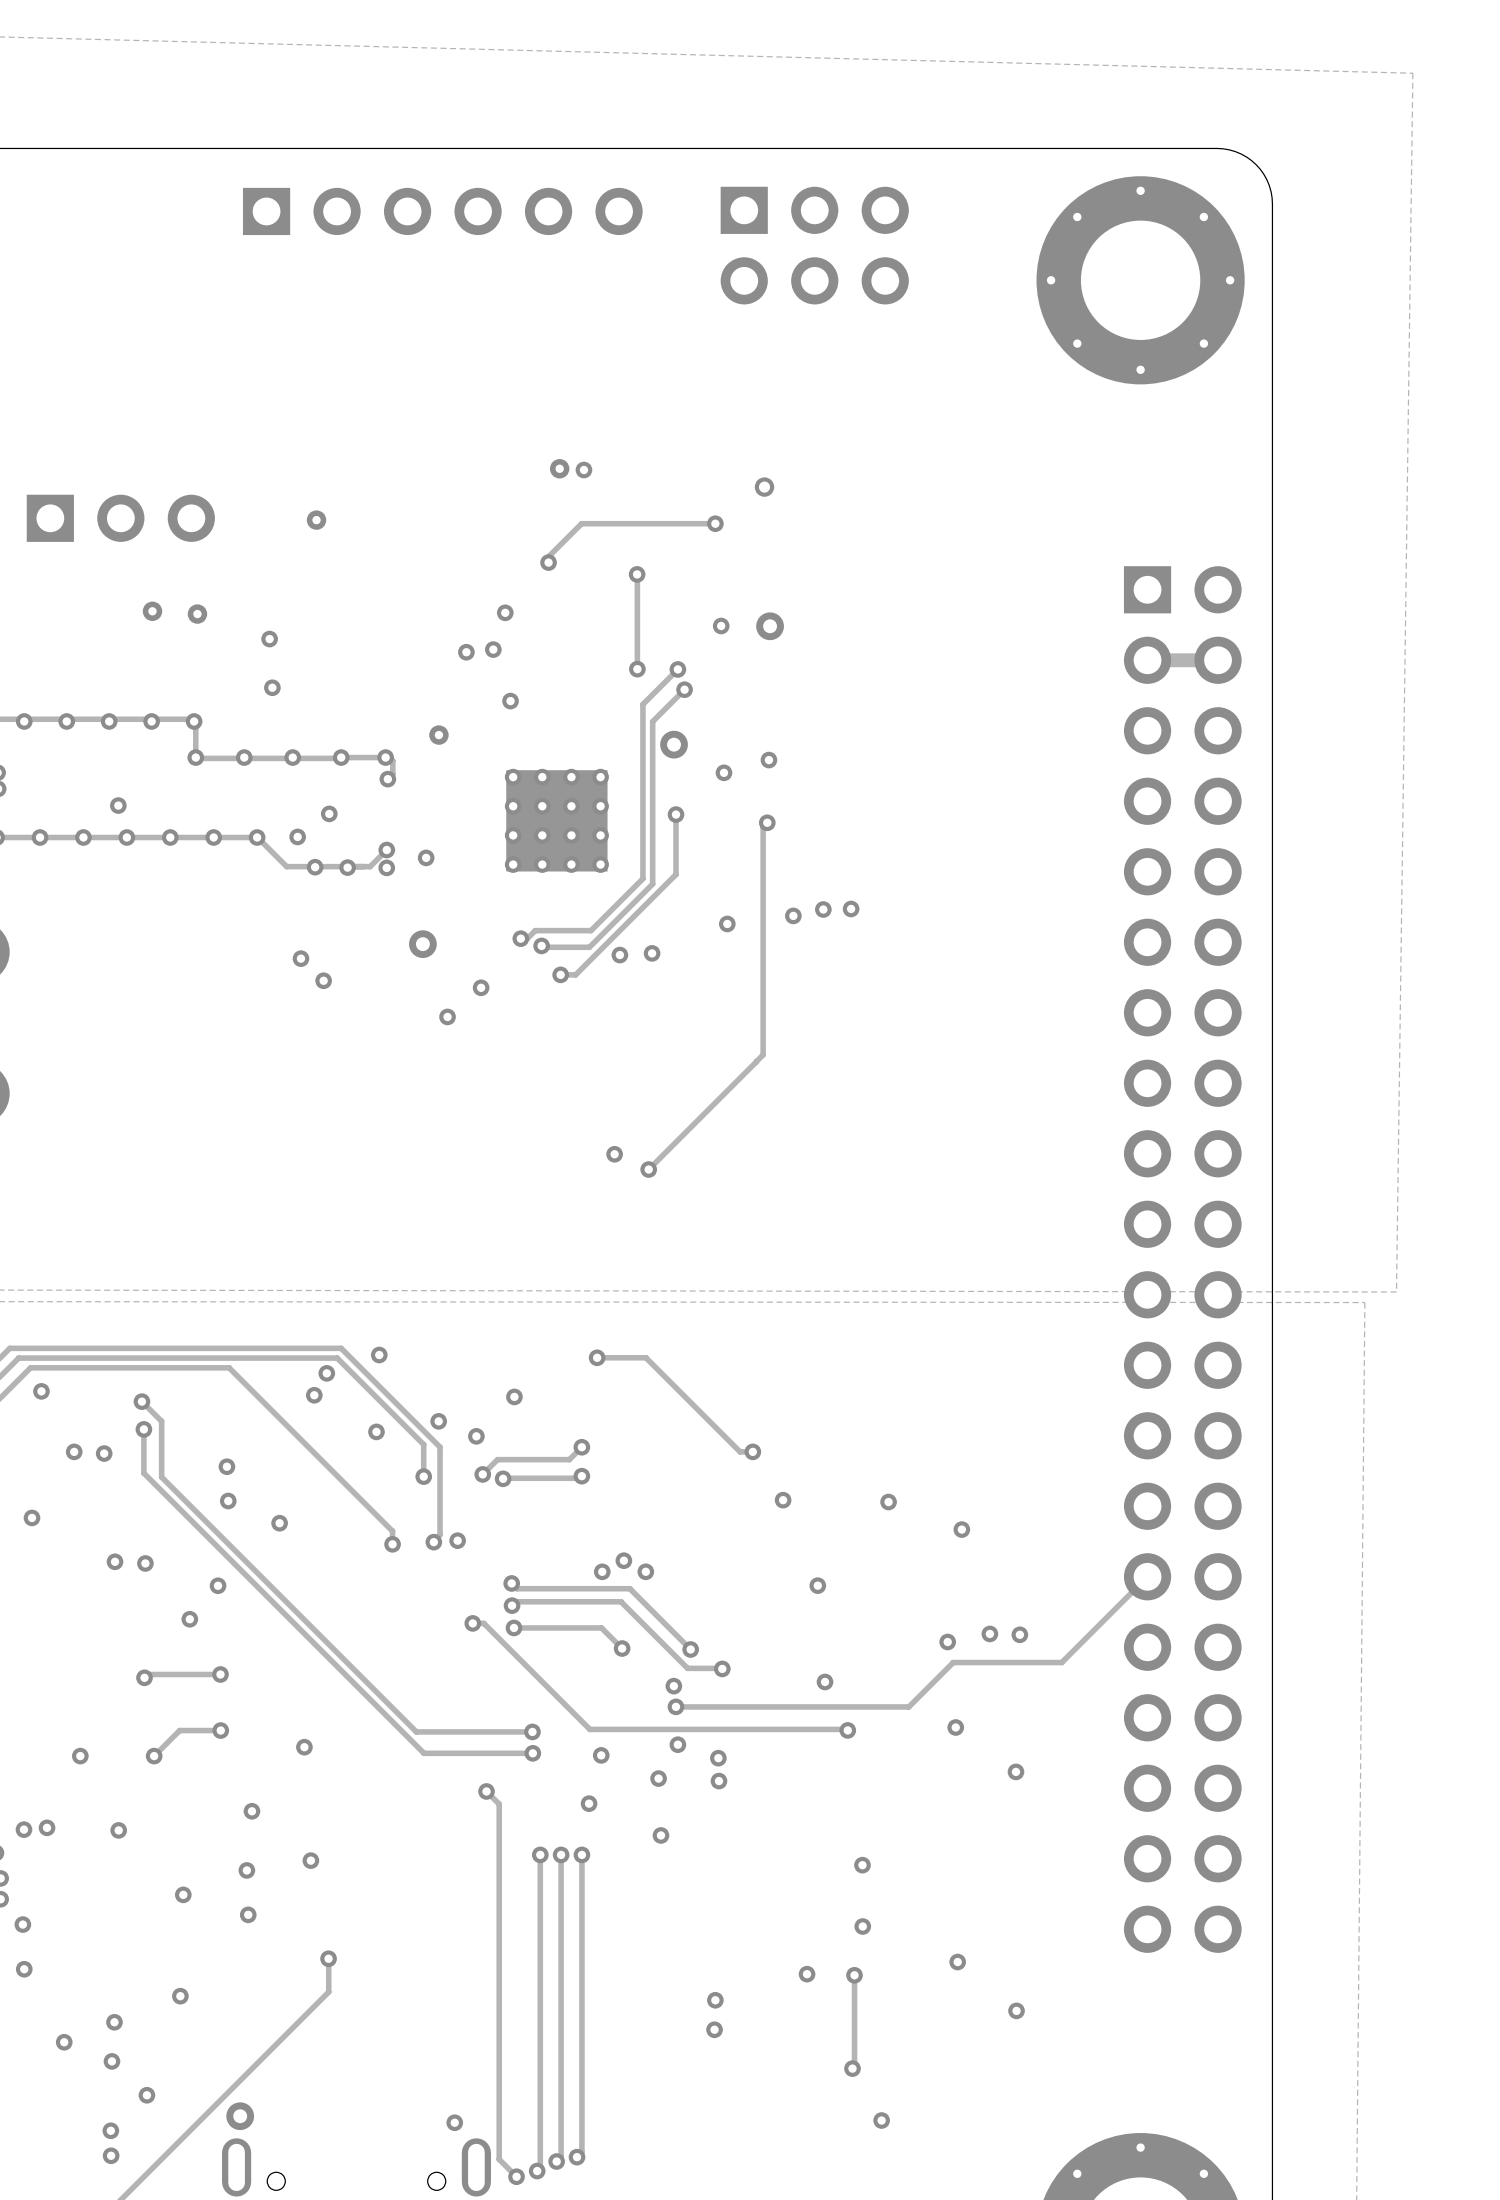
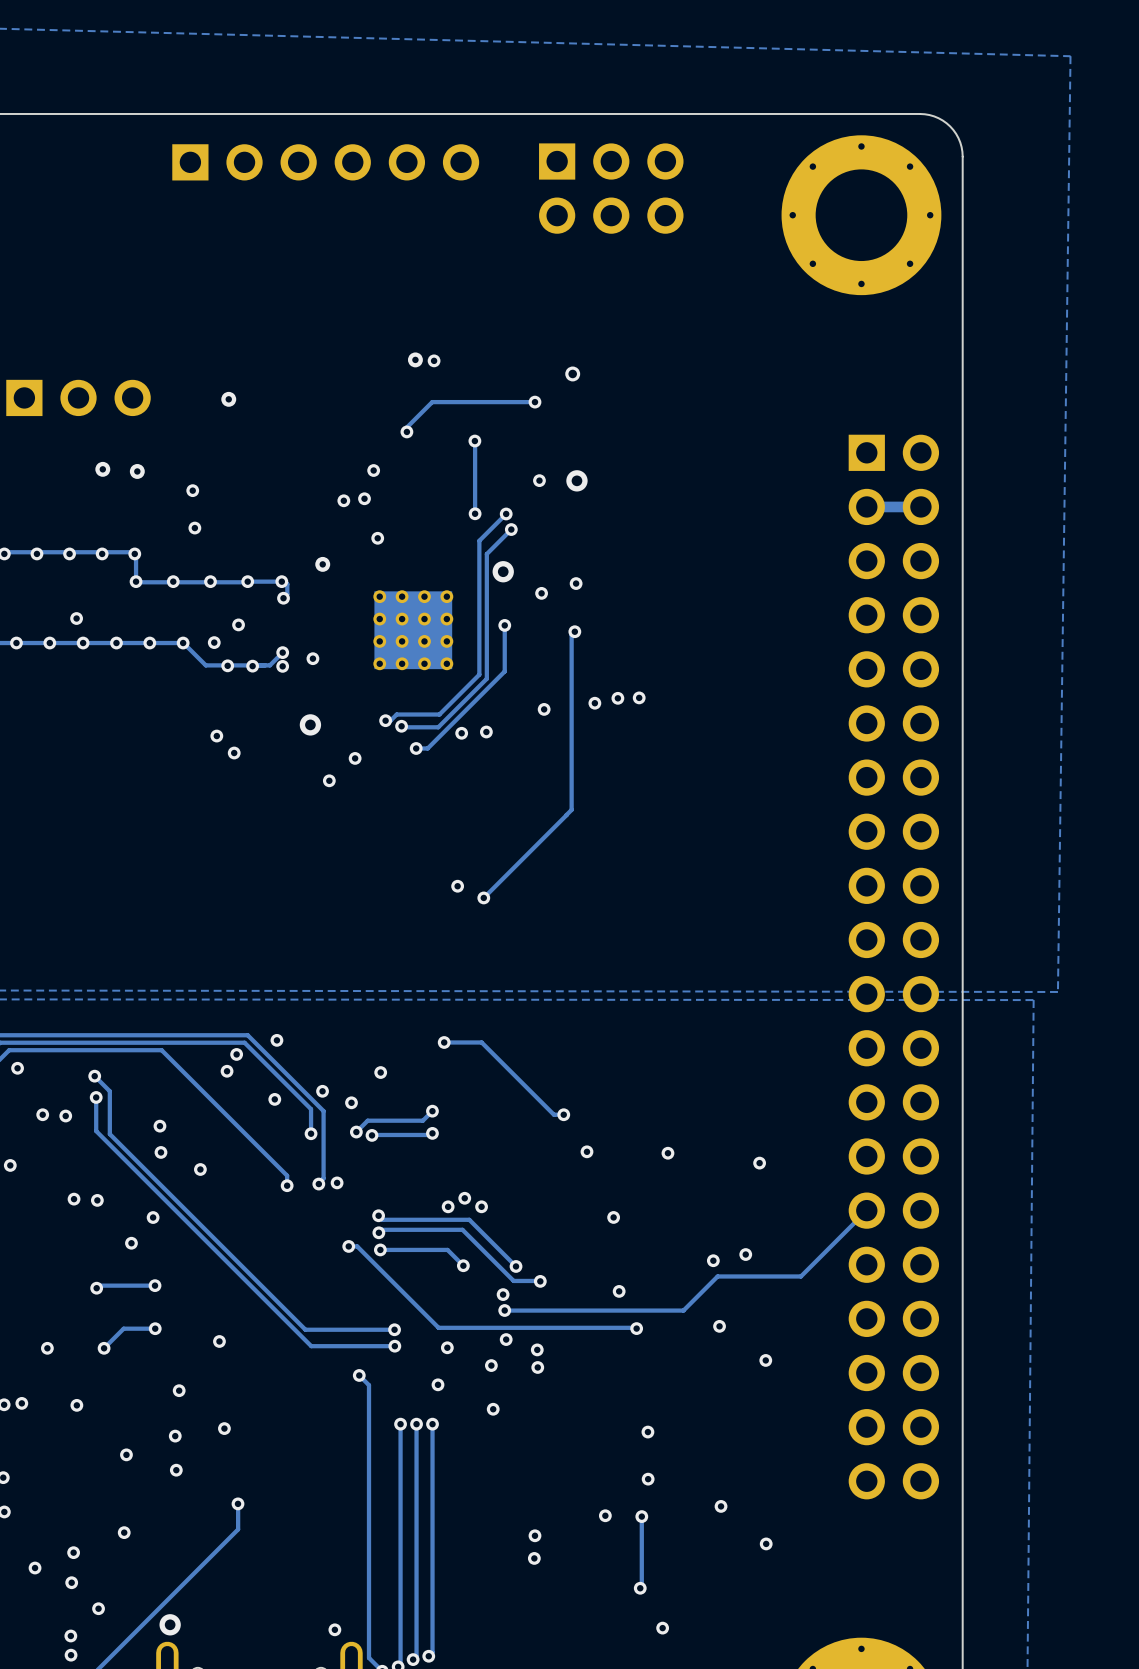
via position: (961, 1529) -> (759, 1163)
via: (1019, 1634) -> none

